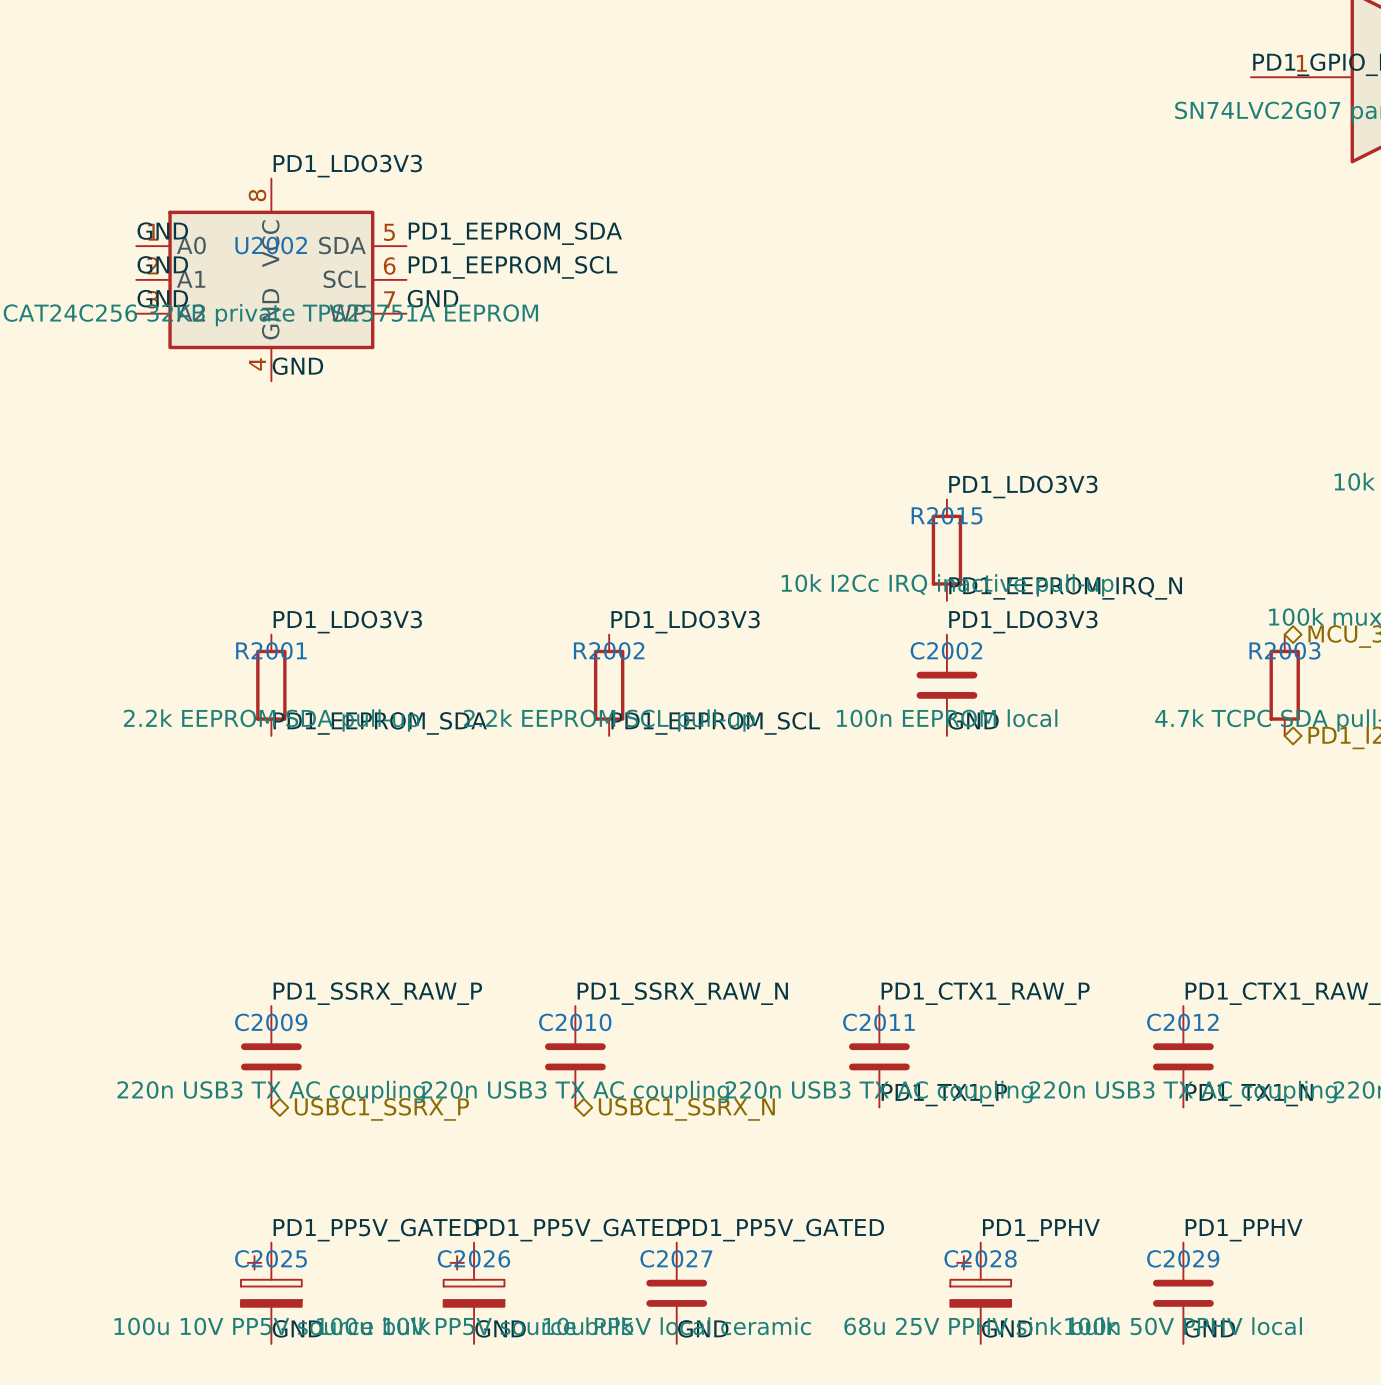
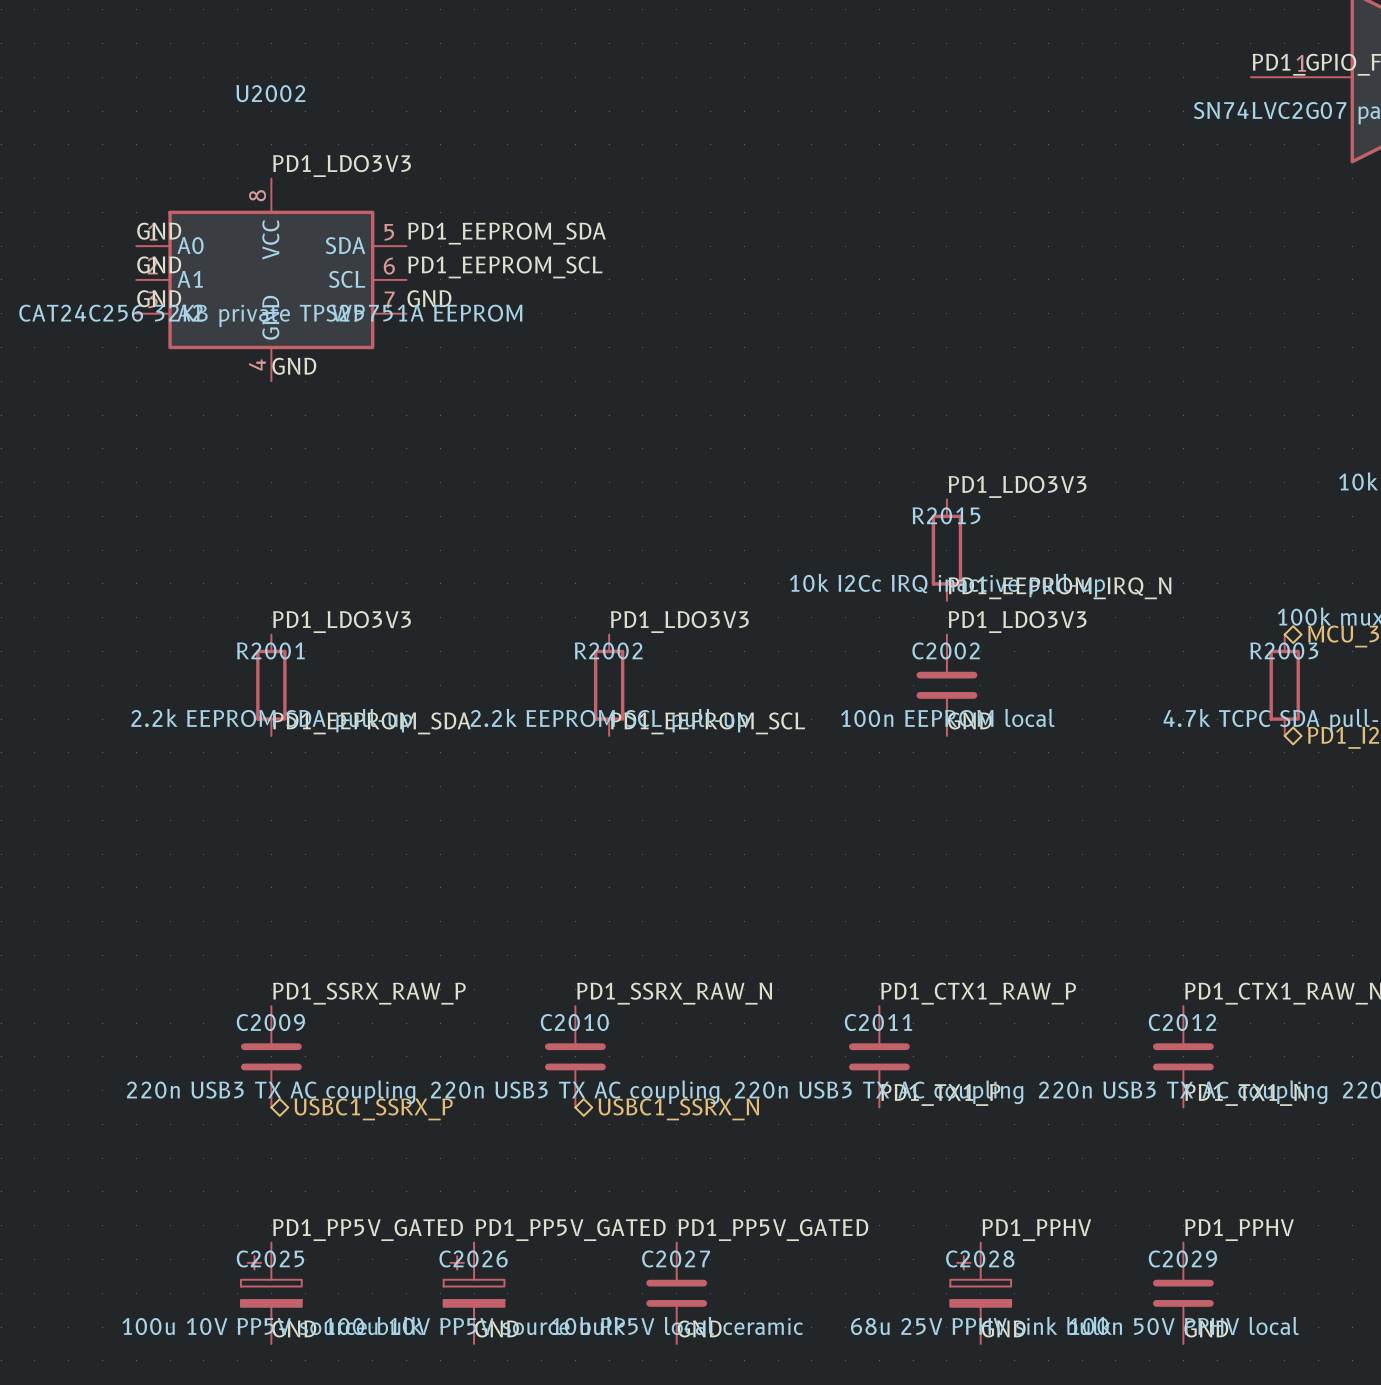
U2002 name position: U2002 (271, 245) -> U2002 (270, 93)

